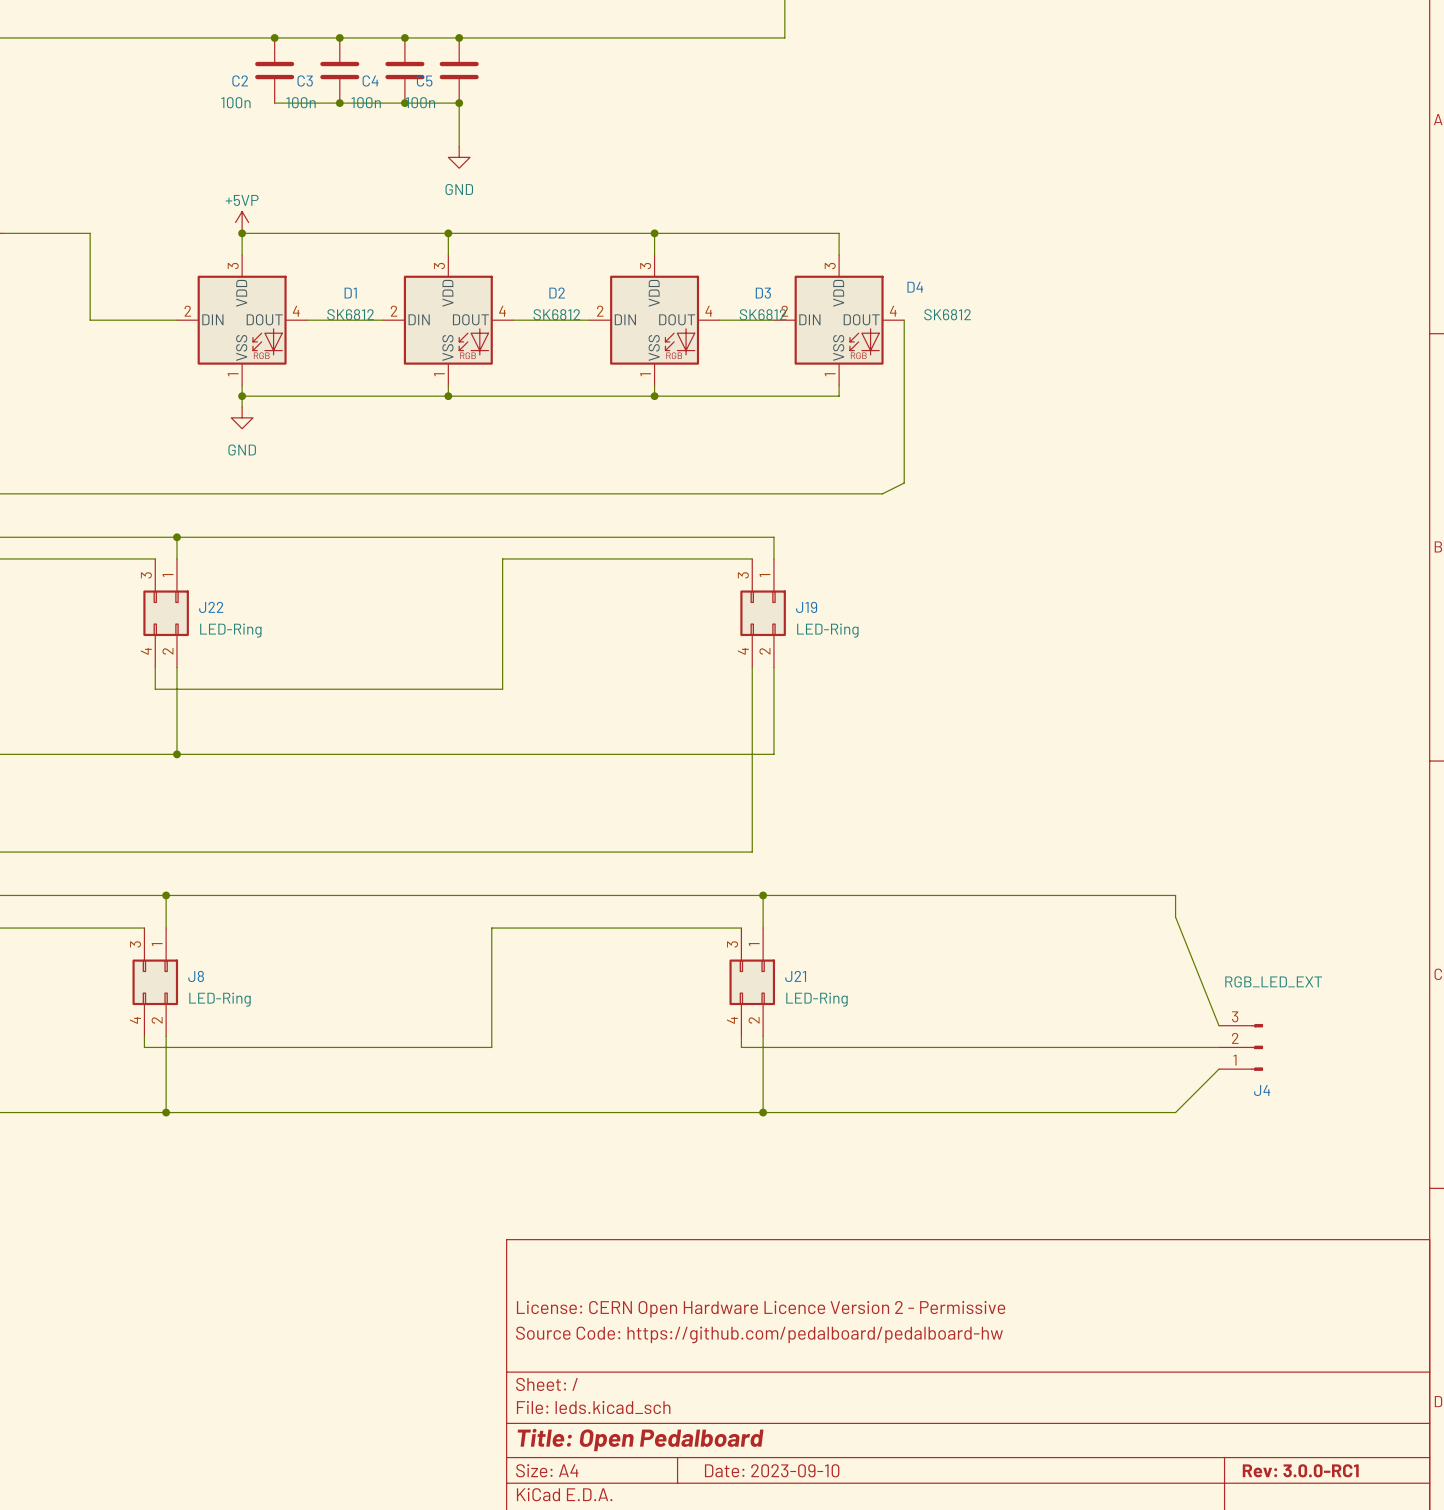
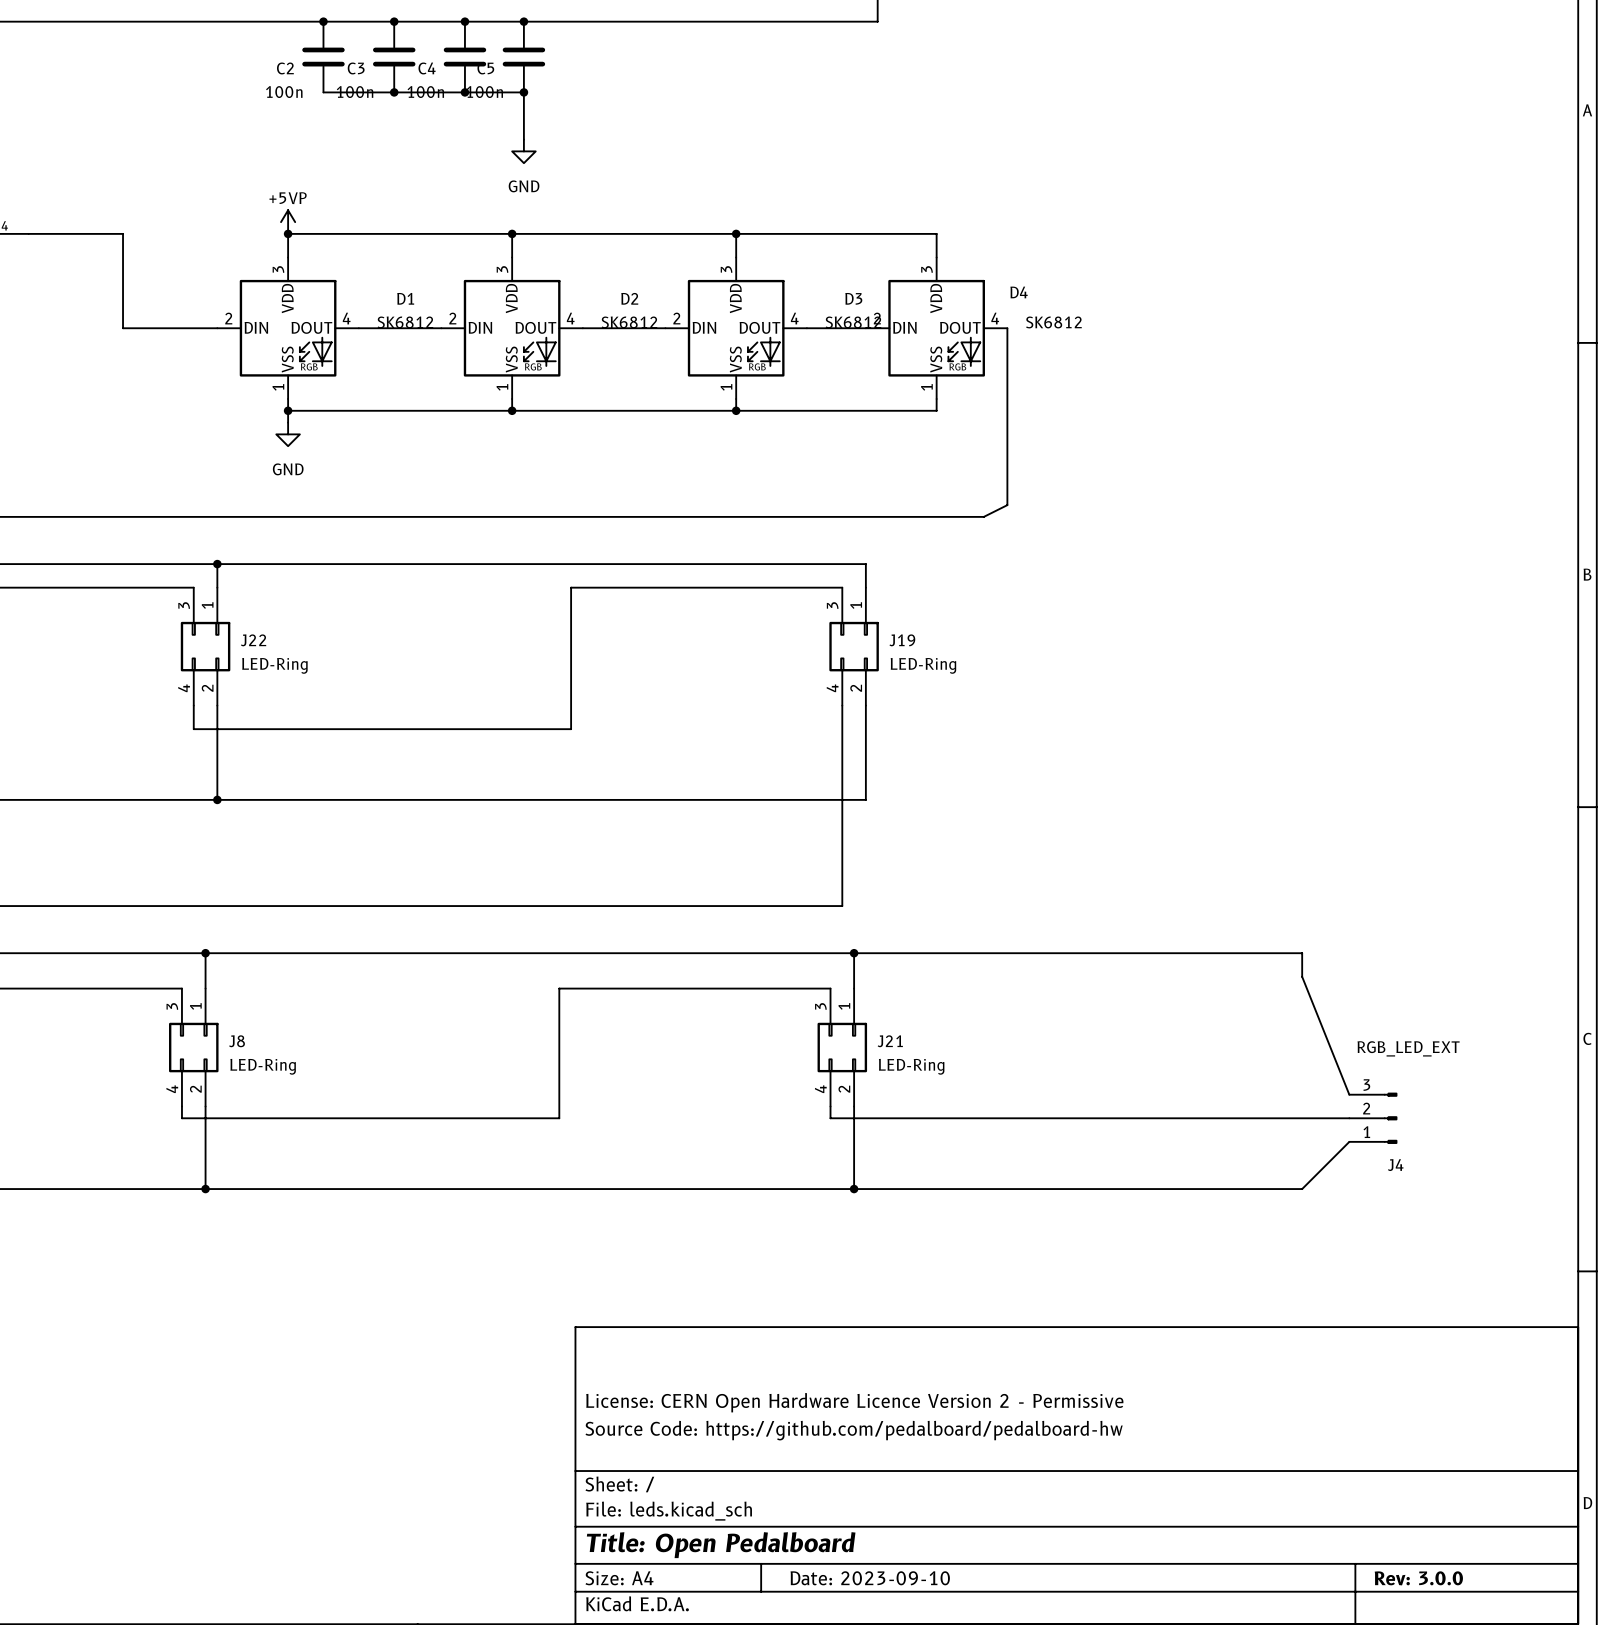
title block: Rev: 3.0.0-RC1 (1300, 1470) -> Rev: 3.0.0 (1418, 1578)

